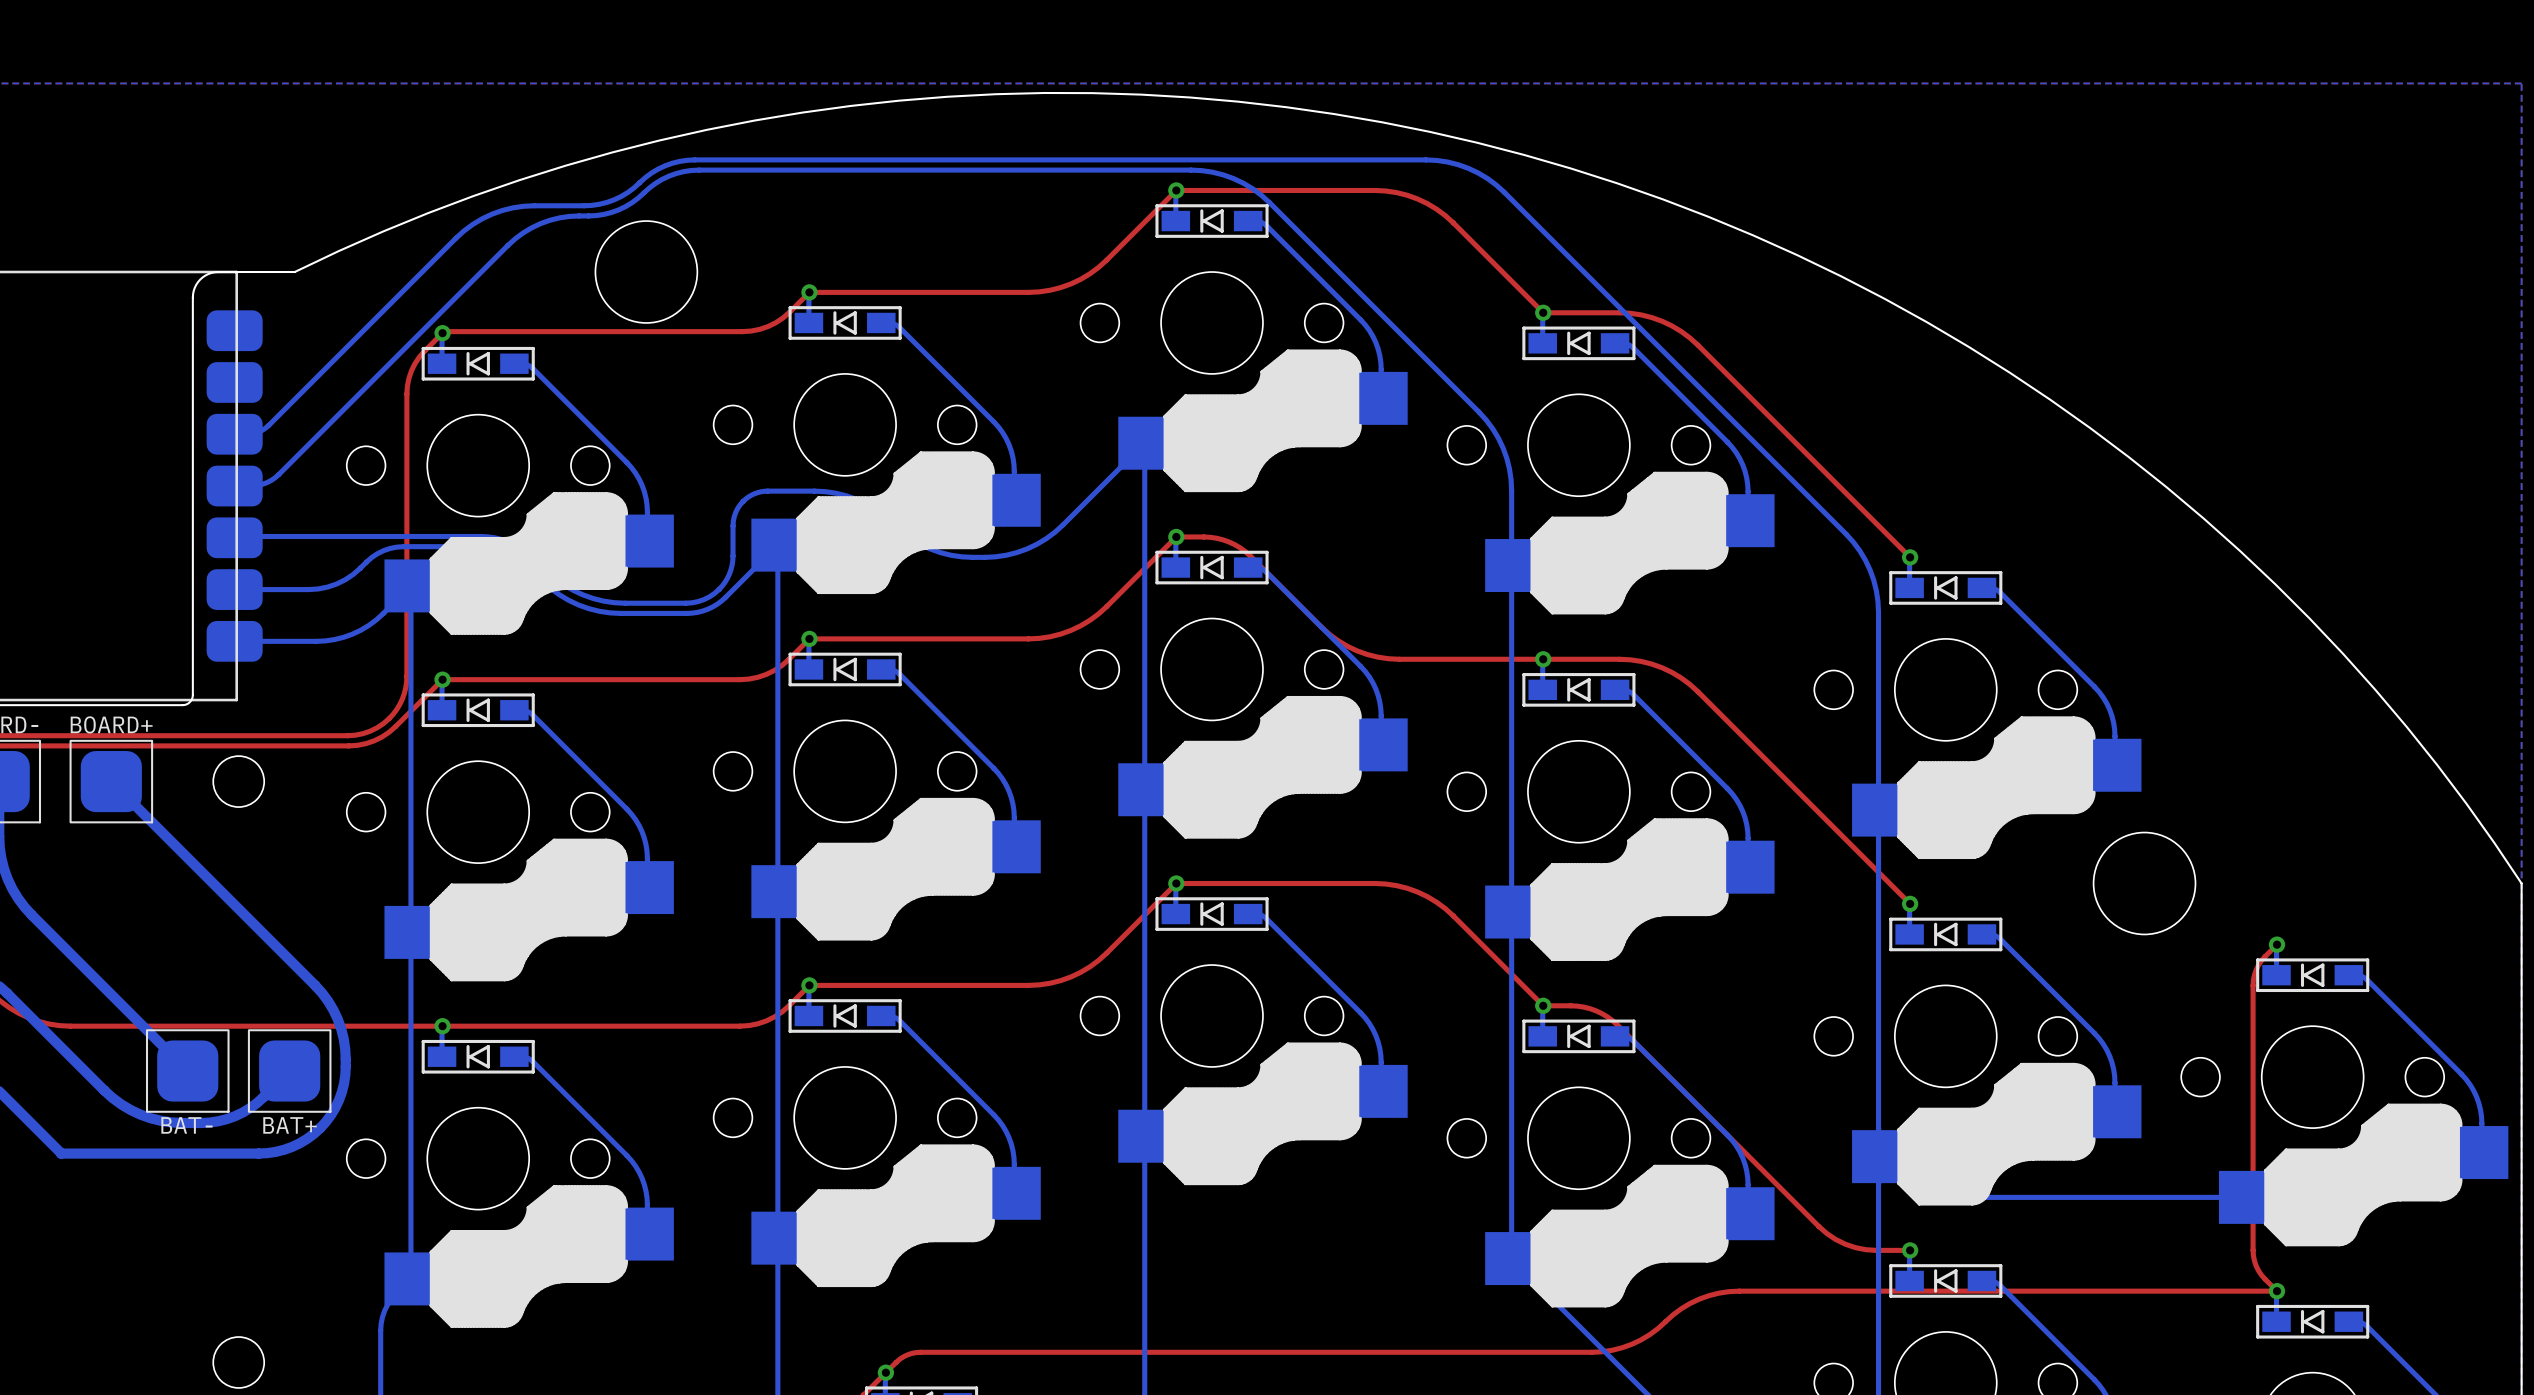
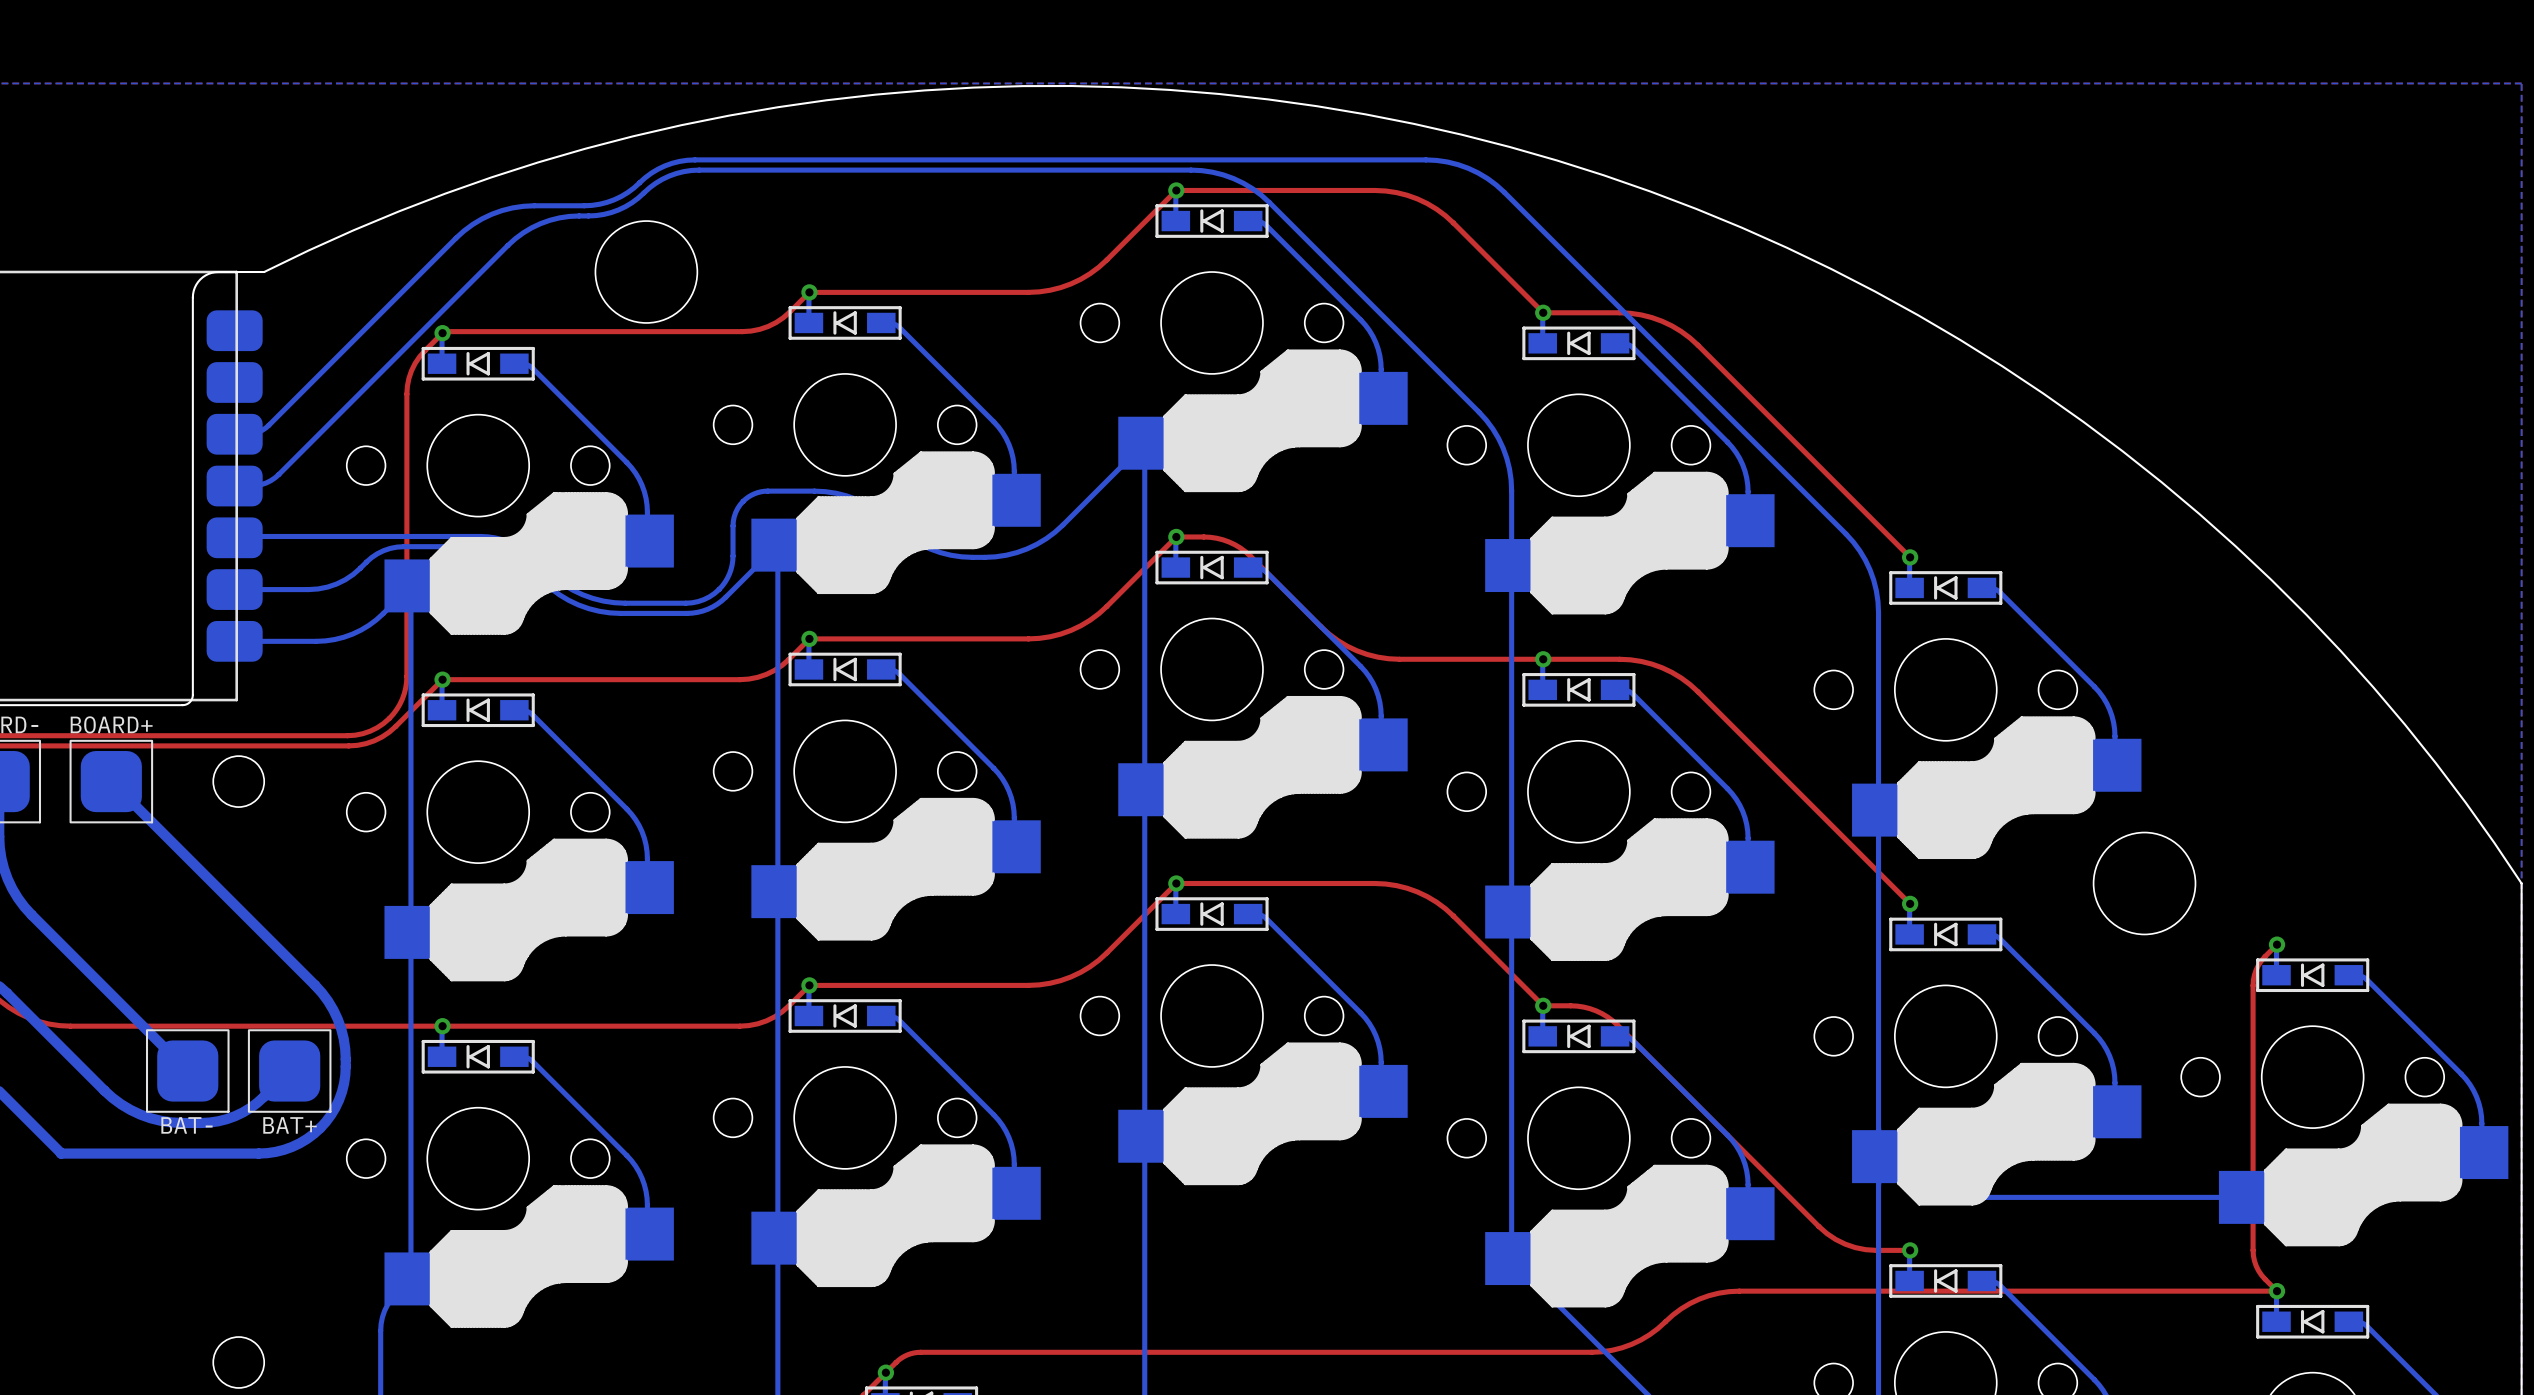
board edge: (264, 272) (294, 272) (383, 231) (473, 196) (612, 152) (754, 120) (898, 100) (995, 94) (1092, 93) (1238, 101) (1382, 122) (1524, 154) (1662, 199) (1753, 235) (1841, 276) (1968, 346) (2089, 427) (2203, 518) (2309, 618) (2406, 726) (2466, 803) (2521, 883) -> (264, 272) (398, 211) (538, 162) (633, 136) (729, 115) (875, 94) (1022, 86) (1170, 89) (1317, 106) (1413, 123) (1509, 146) (1650, 191) (1741, 227) (1831, 268) (1960, 340) (2083, 421) (2199, 513) (2271, 580) (2340, 650) (2435, 763) (2521, 883)

